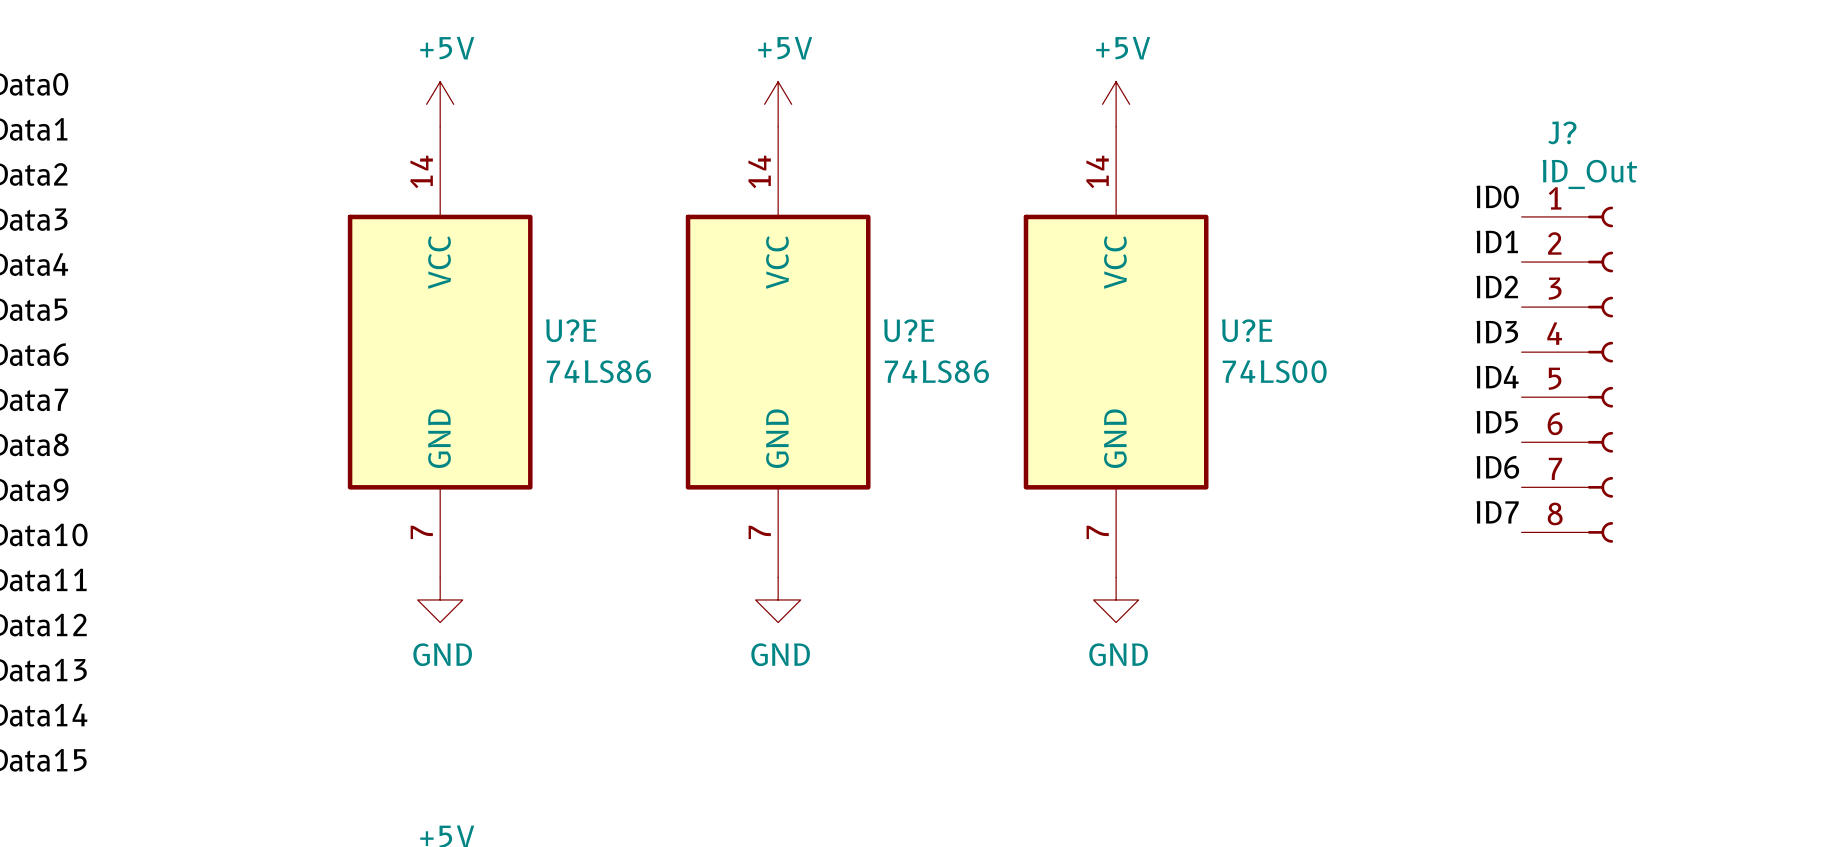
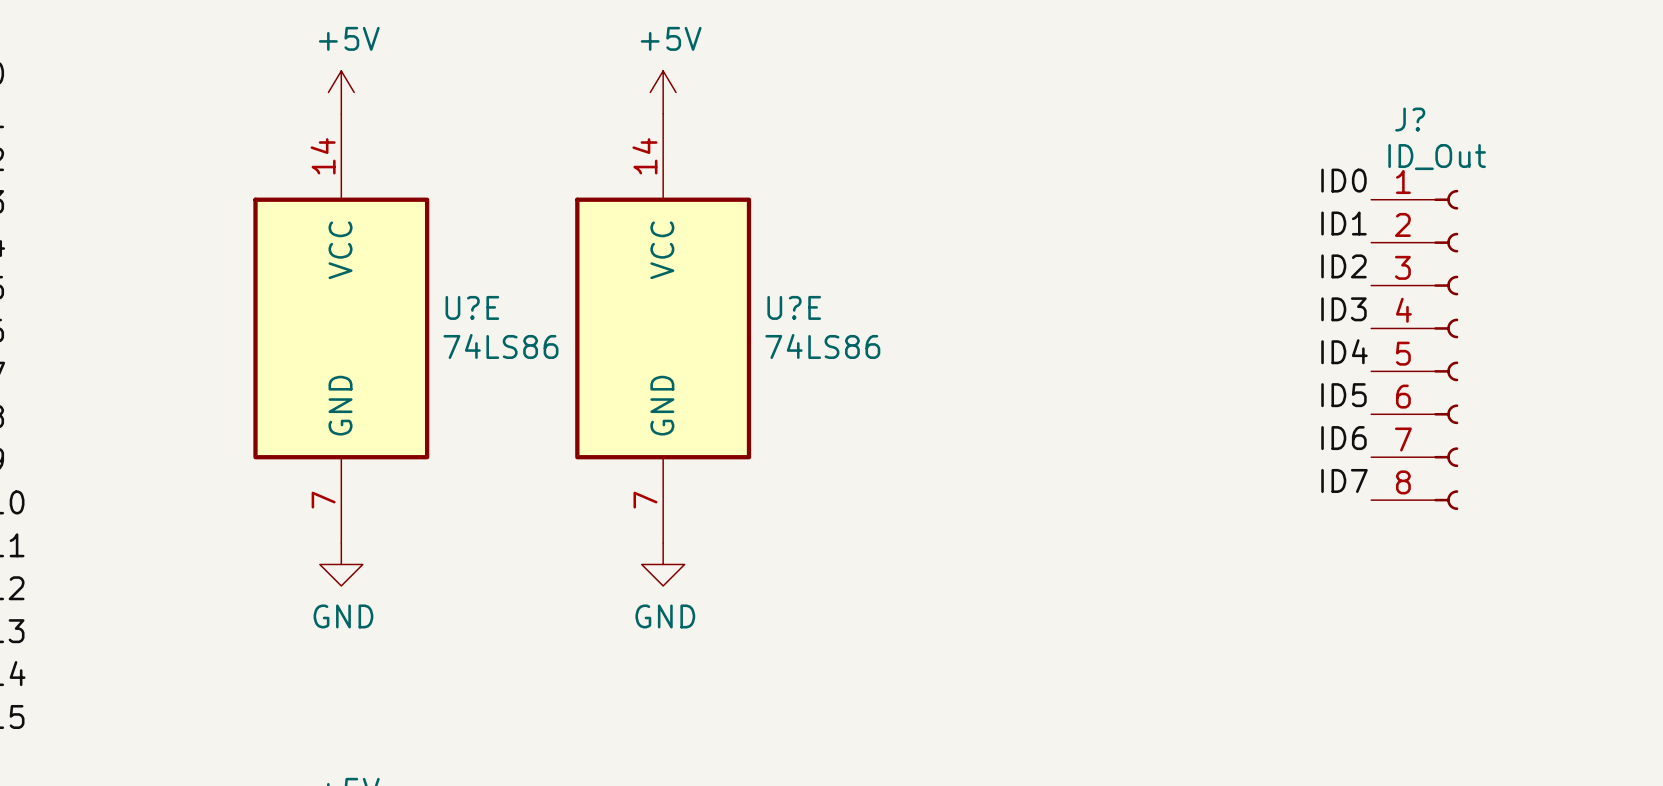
power symbol: +5V (1116, 104) -> none
U?E: 74LS00 (1116, 352) -> none
power symbol: GND (1116, 599) -> none

